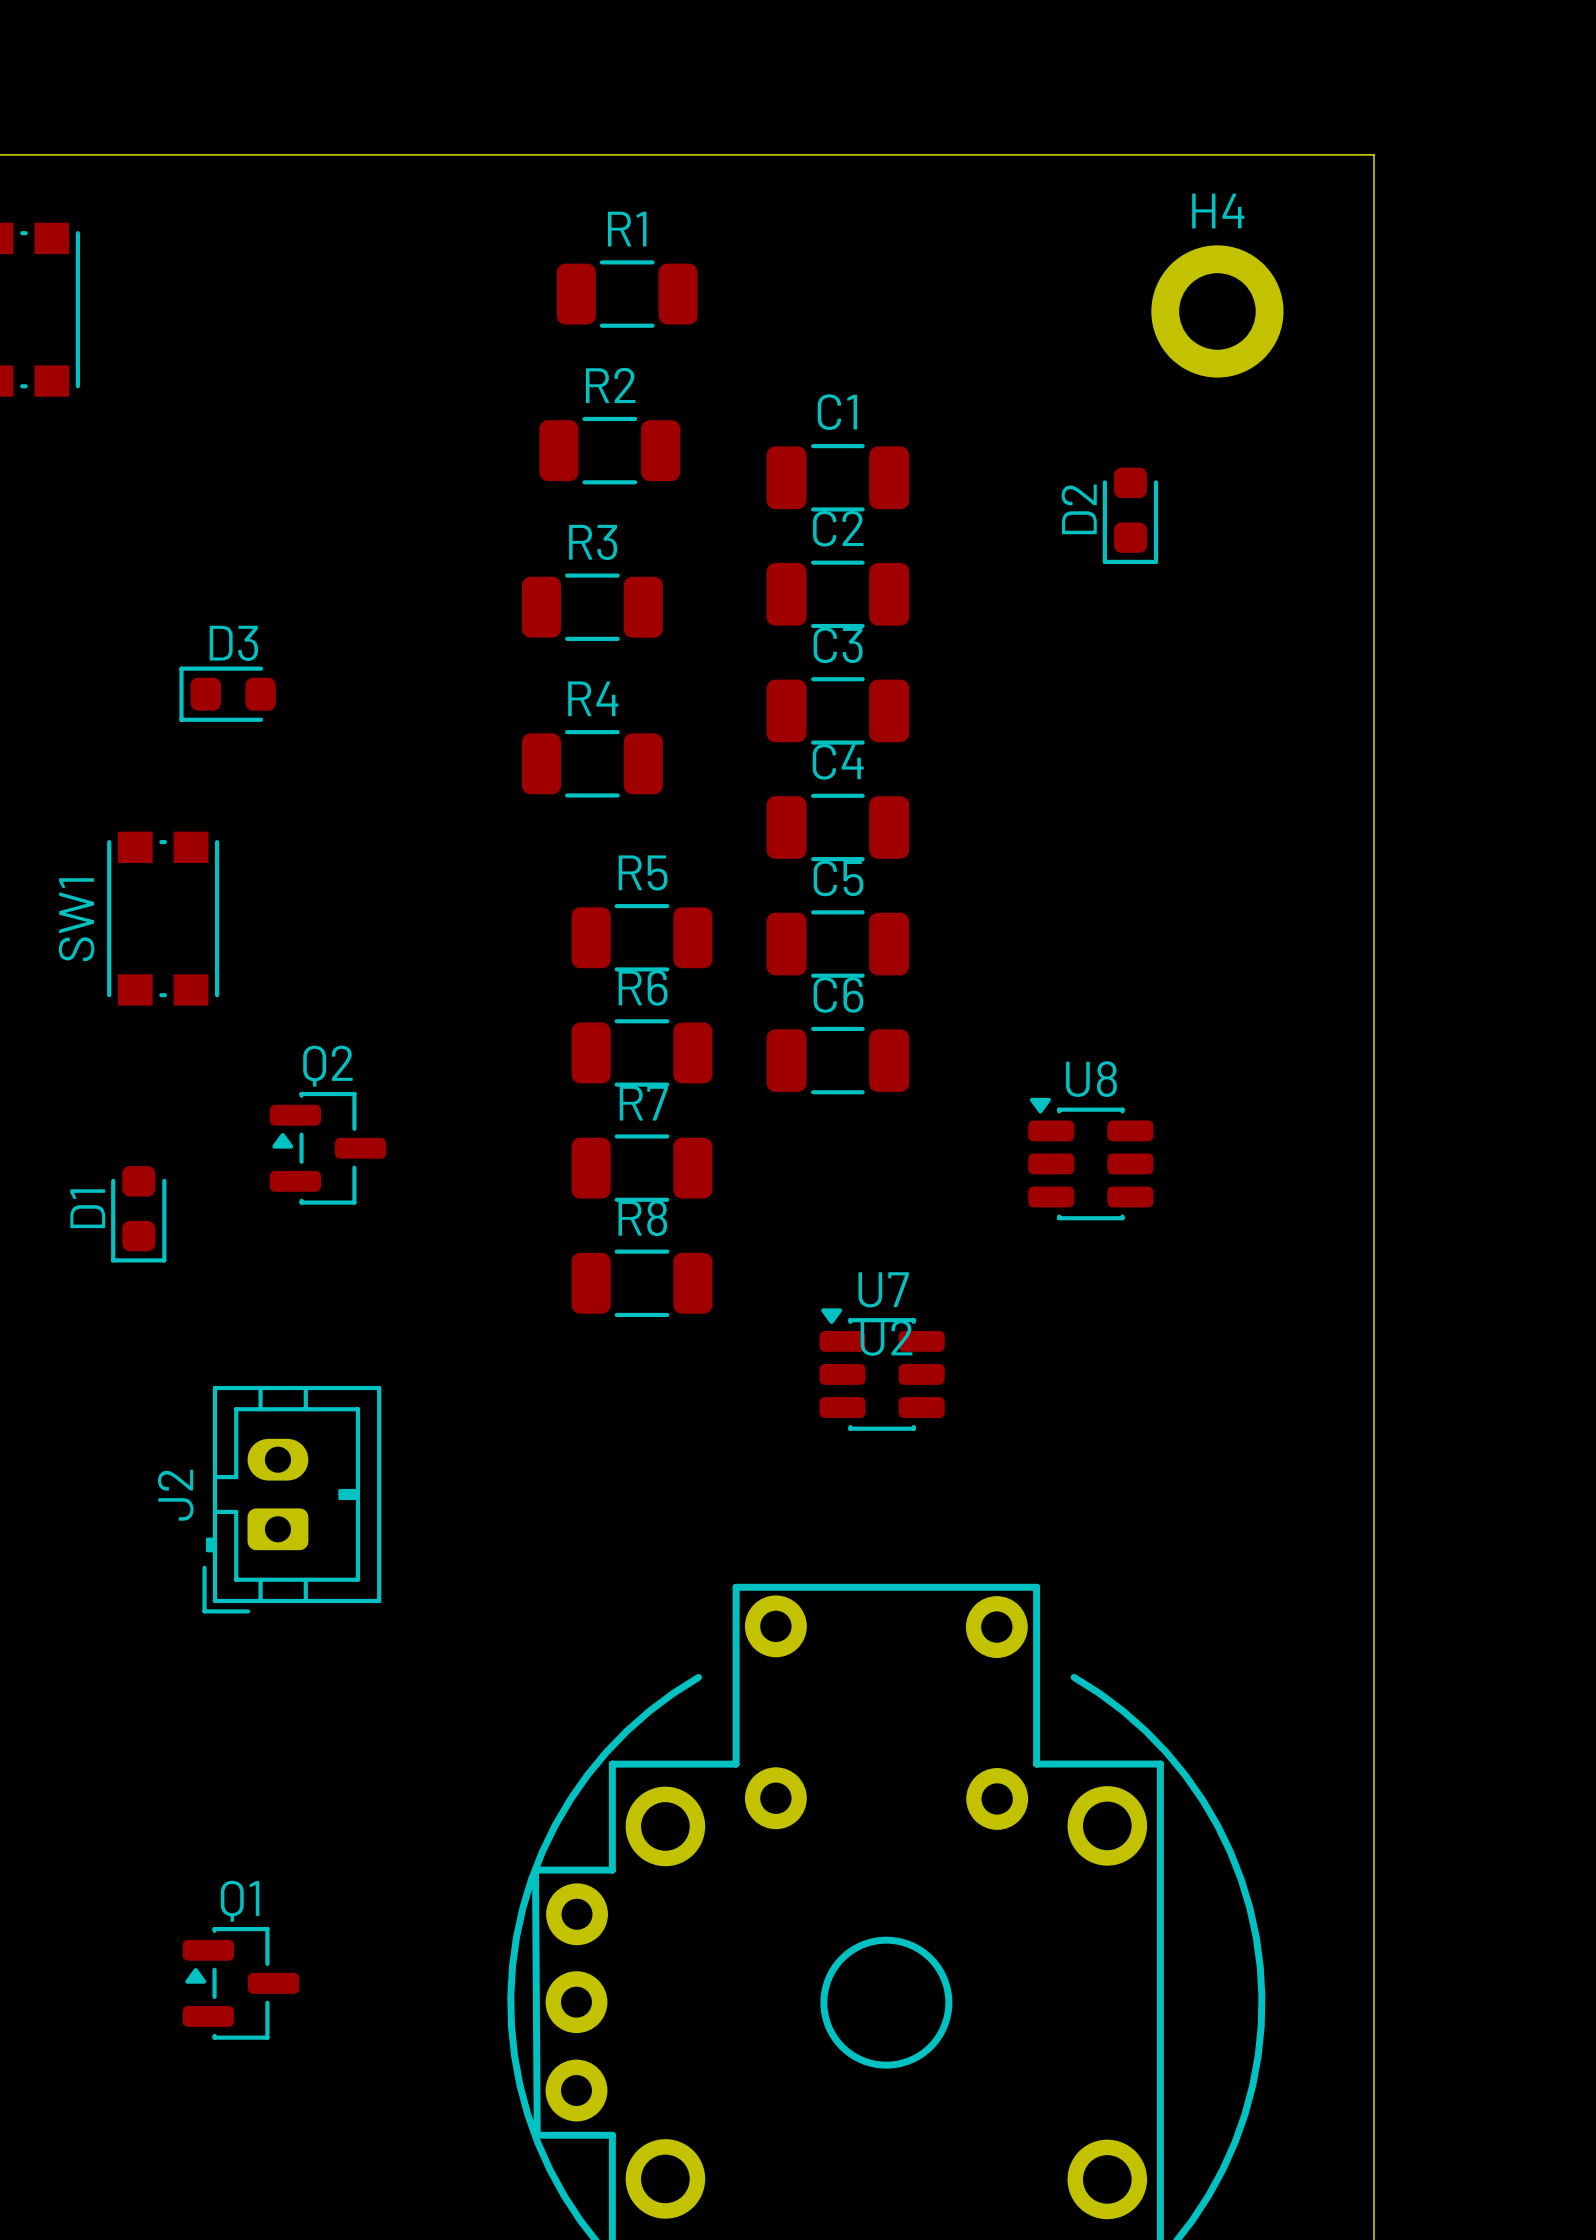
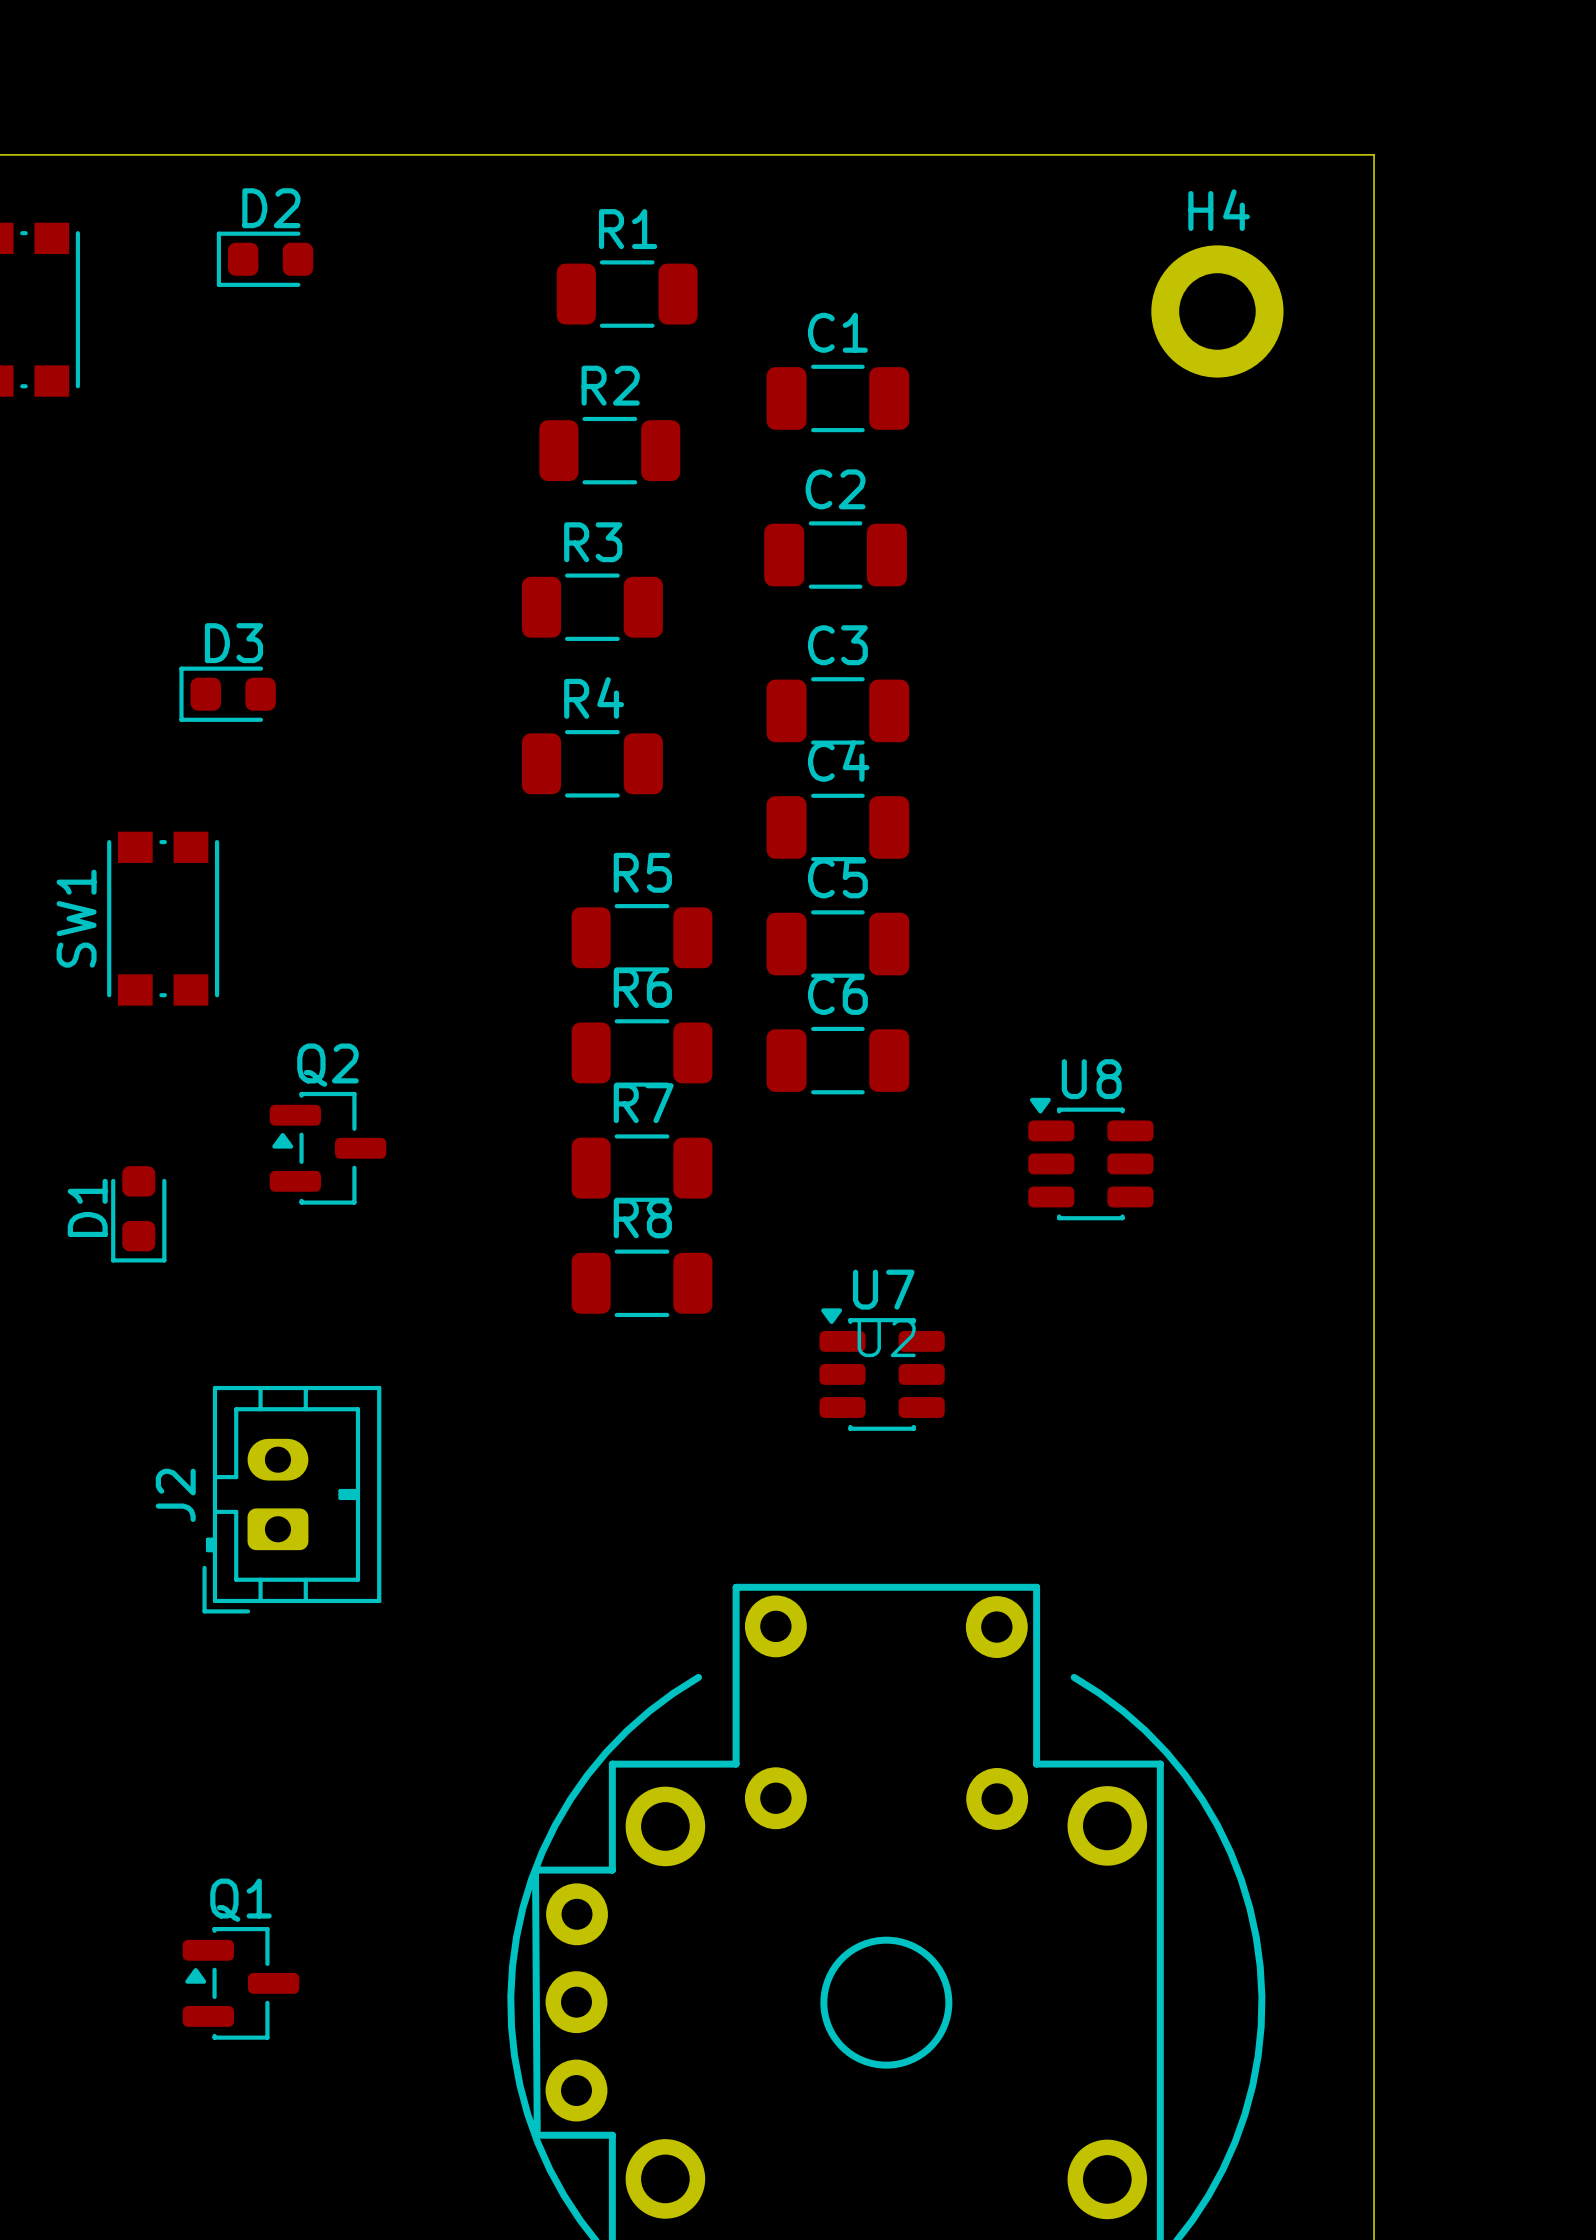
C1 position: (837, 477) -> (837, 398)
D2 rotation: 0° (1130, 515) -> 90° clockwise (265, 259)
D2 position: (1130, 515) -> (265, 259)
C2 position: (837, 594) -> (835, 555)

